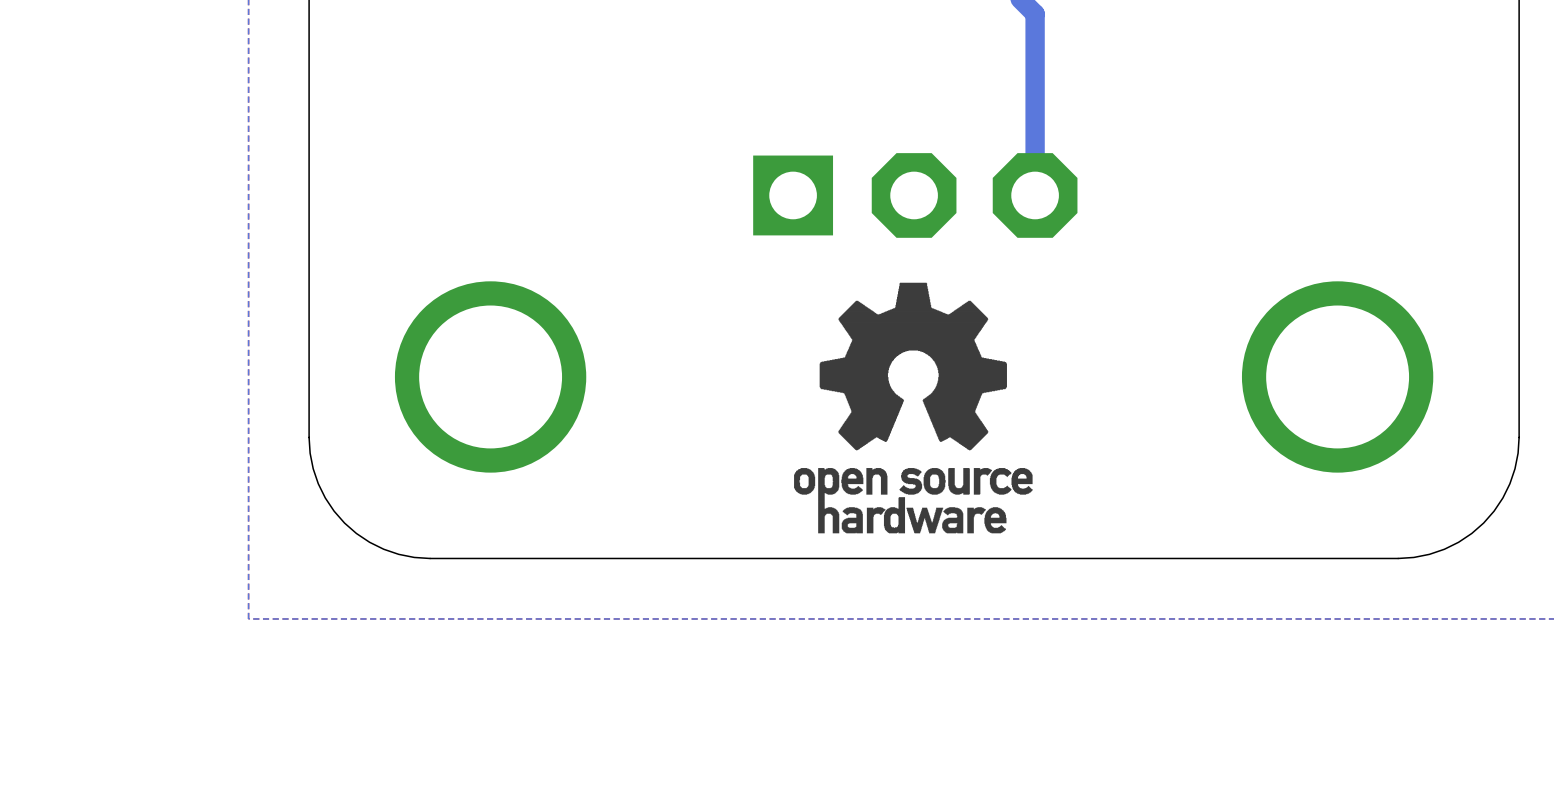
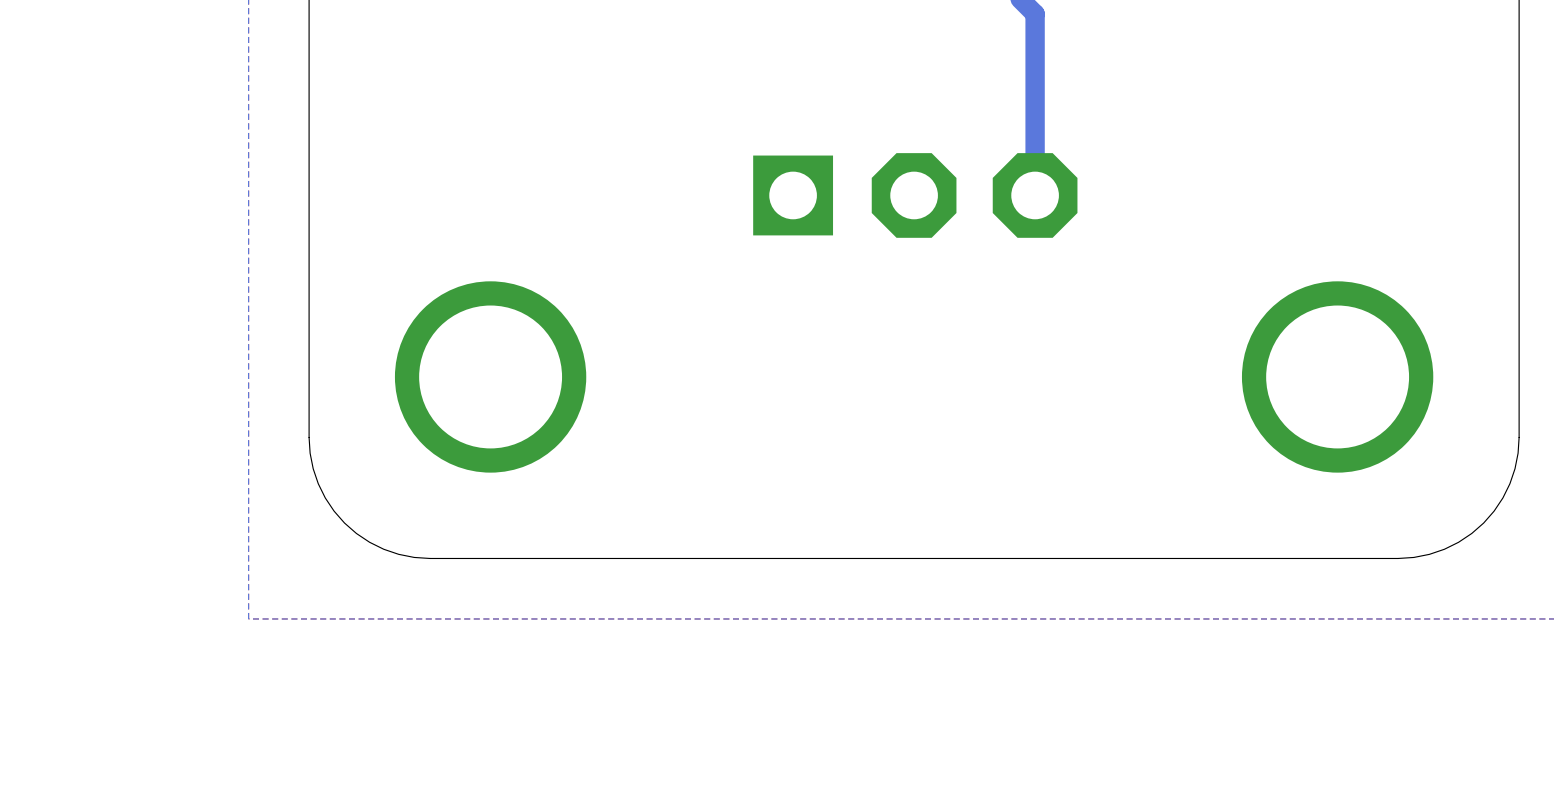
drawing: [794, 282, 1033, 534] -> none

